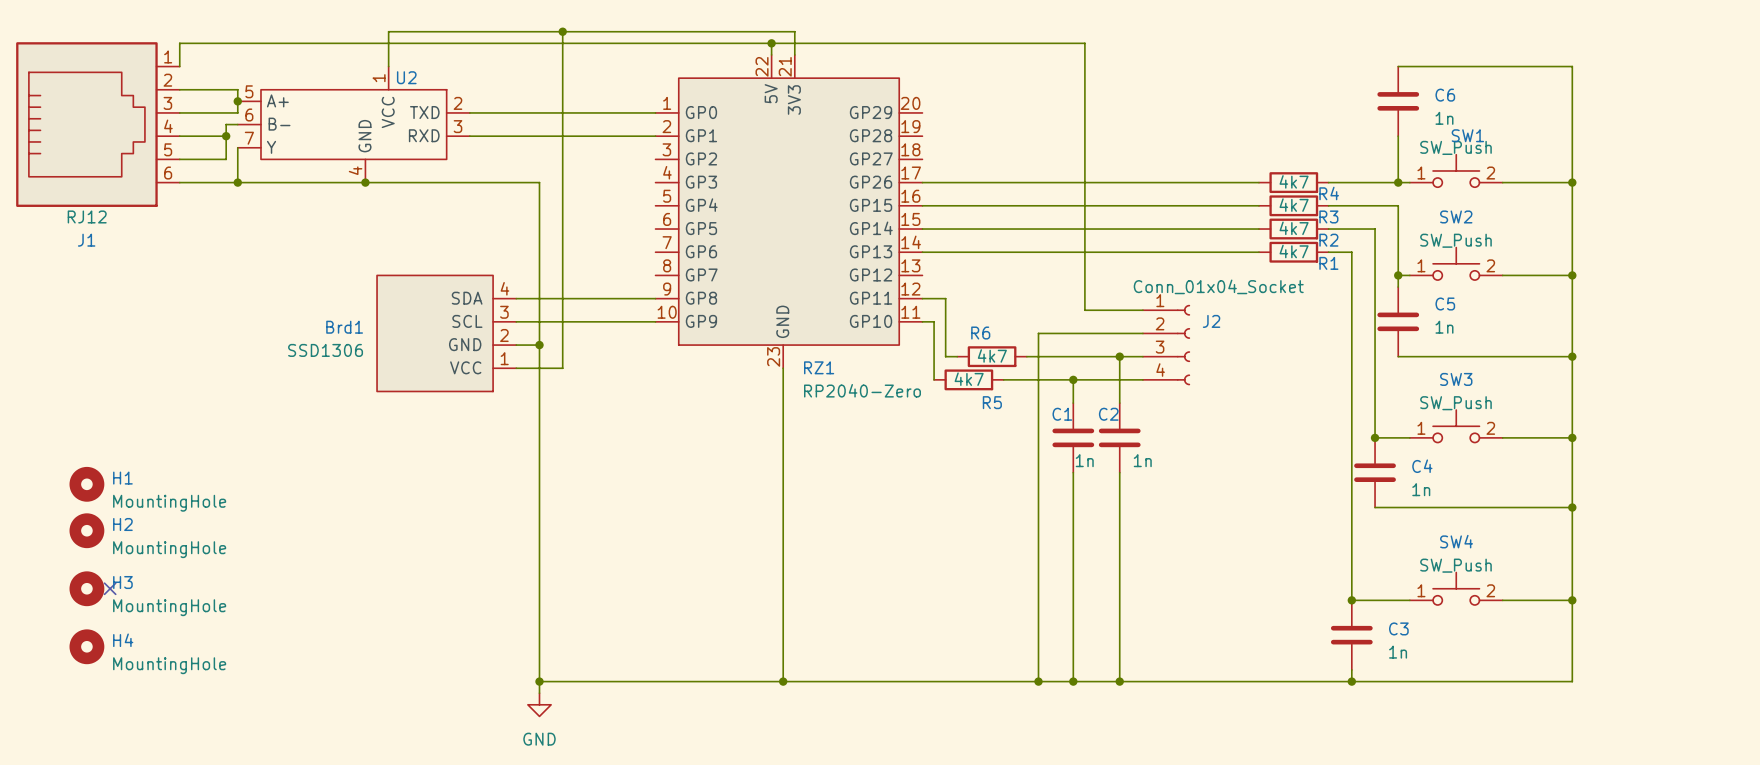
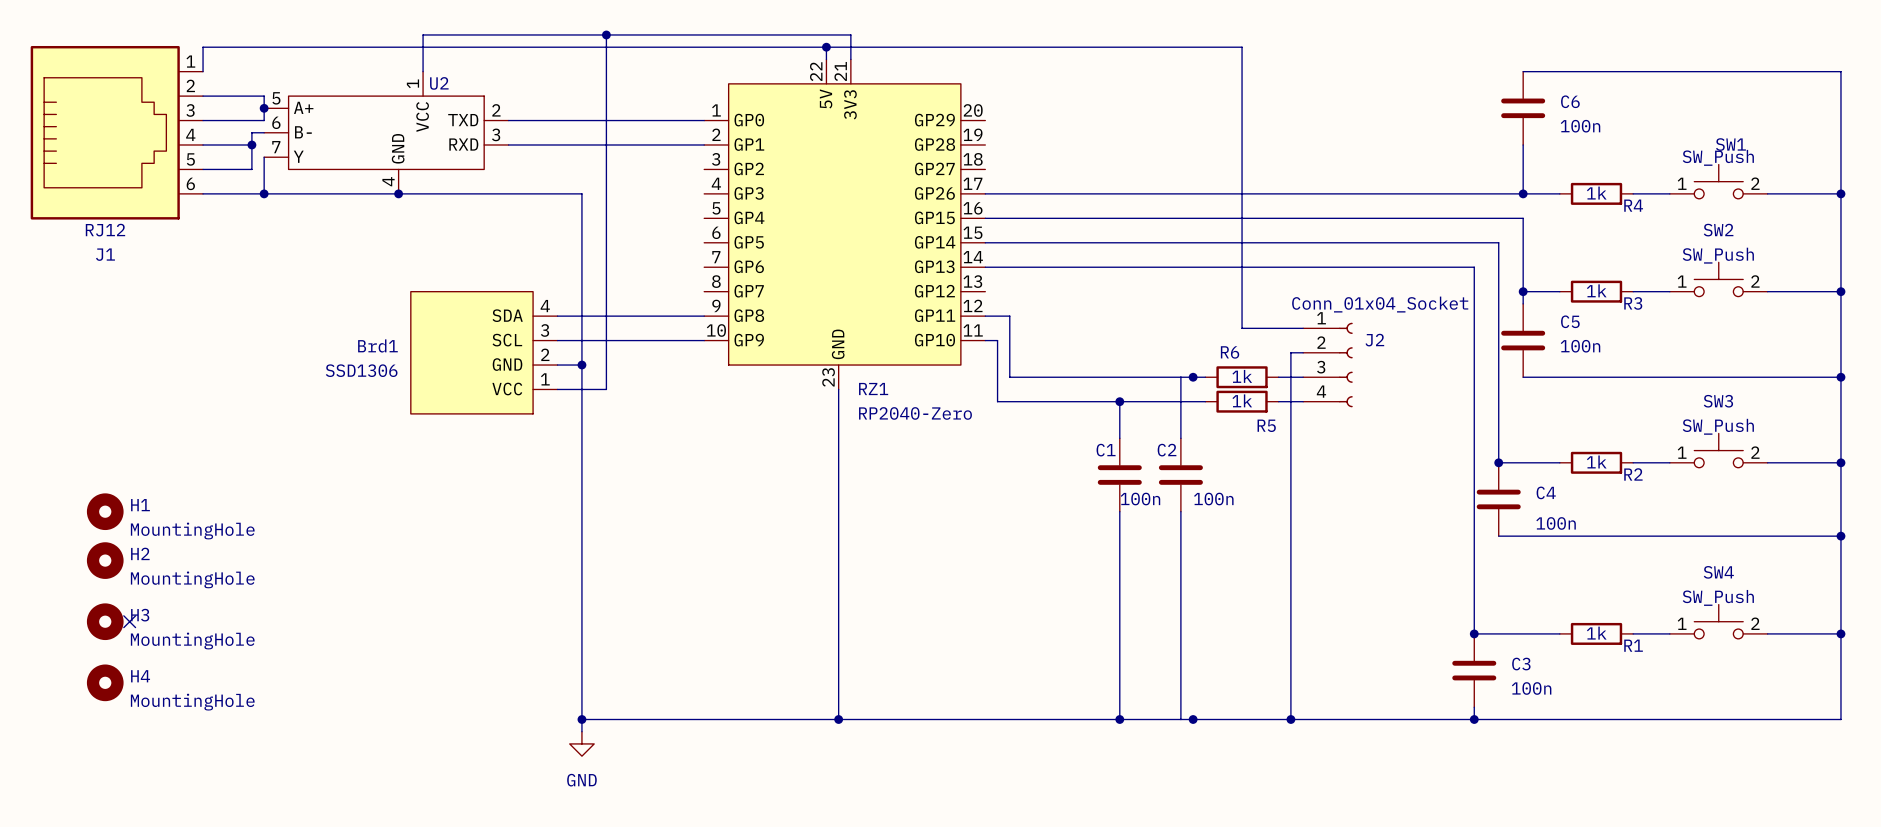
wire: (1084, 43) (1084, 310) (1142, 310) -> (1156, 47) (1242, 47) (1242, 328) (1303, 328)
wire: (1398, 66) (1433, 66) -> none
wire: (1572, 66) (1572, 681) -> (1669, 71) (1840, 71) (1840, 719) (1669, 719)
C6 position: (1398, 101) -> (1523, 108)
C6 value: 1n (1444, 118) -> 100n (1580, 126)
wire: (1398, 136) (1398, 182) -> (1523, 144) (1523, 193)
SW1 position: (1456, 170) -> (1718, 181)
R4 value: 4k7 (1294, 181) -> 1k (1596, 193)
wire: none -> (1339, 193) (1413, 193)
R4 position: (1293, 182) -> (1596, 193)
junction position: (1398, 182) -> (1523, 193)
wire: none -> (1498, 193) (1559, 193)
wire: (1502, 182) (1537, 182) -> none
junction: (1572, 182) -> none
wire: none -> (1767, 193) (1840, 193)
junction: none -> (1840, 193)
wire: none -> (1339, 218) (1413, 218)
R3 position: (1293, 205) -> (1596, 291)
R3 value: 4k7 (1294, 205) -> 1k (1596, 290)
wire: (1398, 205) (1398, 287) -> (1486, 218) (1523, 218) (1523, 303)
R2 value: 4k7 (1294, 228) -> 1k (1596, 461)
wire: none -> (1339, 242) (1413, 242)
R2 position: (1293, 229) -> (1596, 462)
wire: (1375, 229) (1375, 437) (1409, 437) -> (1462, 242) (1498, 242) (1498, 462) (1559, 462)
R1 value: 4k7 (1294, 251) -> 1k (1596, 633)
wire: none -> (1339, 267) (1413, 267)
R1 position: (1293, 252) -> (1596, 633)
wire: (1351, 252) (1351, 600) (1386, 600) -> (1437, 267) (1474, 267) (1474, 633)
SW2 position: (1456, 263) -> (1718, 279)
wire: (1398, 275) (1409, 275) -> none
junction position: (1398, 275) -> (1523, 291)
wire: (1502, 275) (1537, 275) -> (1523, 291) (1559, 291)
junction: (1572, 275) -> none
wire: none -> (1767, 291) (1840, 291)
junction: none -> (1840, 291)
C5 position: (1398, 321) -> (1523, 340)
C5 value: 1n (1444, 327) -> 100n (1580, 346)
wire: (1142, 333) (1038, 333) (1038, 681) -> none
wire: none -> (1303, 352) (1290, 352) (1290, 719)
J2 position: (1166, 345) -> (1327, 365)
R6 value: 4k7 (992, 355) -> 1k (1242, 376)
wire: none -> (1022, 377) (1095, 377)
R6 position: (992, 356) -> (1242, 377)
wire: none -> (1180, 377) (1180, 438)
wire: (1119, 356) (1119, 403) -> none
wire: none -> (1278, 377) (1303, 377)
wire: (1398, 356) (1433, 356) -> none
wire: none -> (1669, 377) (1840, 377)
junction: (1572, 356) -> none
junction: none -> (1840, 377)
wire: none -> (997, 401) (1070, 401)
R5 position: (968, 379) -> (1242, 401)
R5 value: 4k7 (969, 379) -> 1k (1242, 400)
wire: none -> (1119, 401) (1119, 438)
wire: (1073, 379) (1073, 403) -> none
junction position: (1073, 379) -> (1119, 401)
wire: none -> (1278, 401) (1303, 401)
SW3 position: (1456, 426) -> (1718, 450)
C1 position: (1073, 437) -> (1119, 475)
C2 position: (1119, 437) -> (1180, 475)
junction position: (1375, 437) -> (1498, 462)
wire: (1502, 437) (1537, 437) -> none
junction: (1572, 437) -> none
wire: none -> (1767, 462) (1840, 462)
junction: none -> (1840, 462)
C1 value: 1n (1084, 460) -> 100n (1140, 499)
C2 value: 1n (1142, 460) -> 100n (1213, 499)
wire: (1073, 472) (1073, 681) -> none
wire: (1119, 472) (1119, 681) -> none
C4 position: (1375, 472) -> (1498, 499)
wire: none -> (1119, 511) (1119, 719)
wire: none -> (1180, 511) (1180, 719)
C4 value: 1n (1421, 489) -> 100n (1556, 523)
wire: (1375, 507) (1409, 507) -> none
wire: none -> (1669, 536) (1840, 536)
junction: (1572, 507) -> none
junction: none -> (1840, 536)
SW4 position: (1456, 588) -> (1718, 621)
junction position: (1351, 600) -> (1474, 633)
wire: none -> (1498, 633) (1559, 633)
wire: (1502, 600) (1537, 600) -> none
junction: (1572, 600) -> none
wire: none -> (1767, 633) (1840, 633)
junction: none -> (1840, 633)
C3 position: (1351, 635) -> (1474, 670)
C3 value: 1n (1398, 652) -> 100n (1531, 688)
wire: (1351, 669) (1351, 681) -> (1474, 707) (1474, 719)
junction: (1038, 681) -> none
junction: none -> (1119, 719)
junction: (1073, 681) -> none
junction: none -> (1290, 719)
junction position: (1351, 681) -> (1474, 719)

